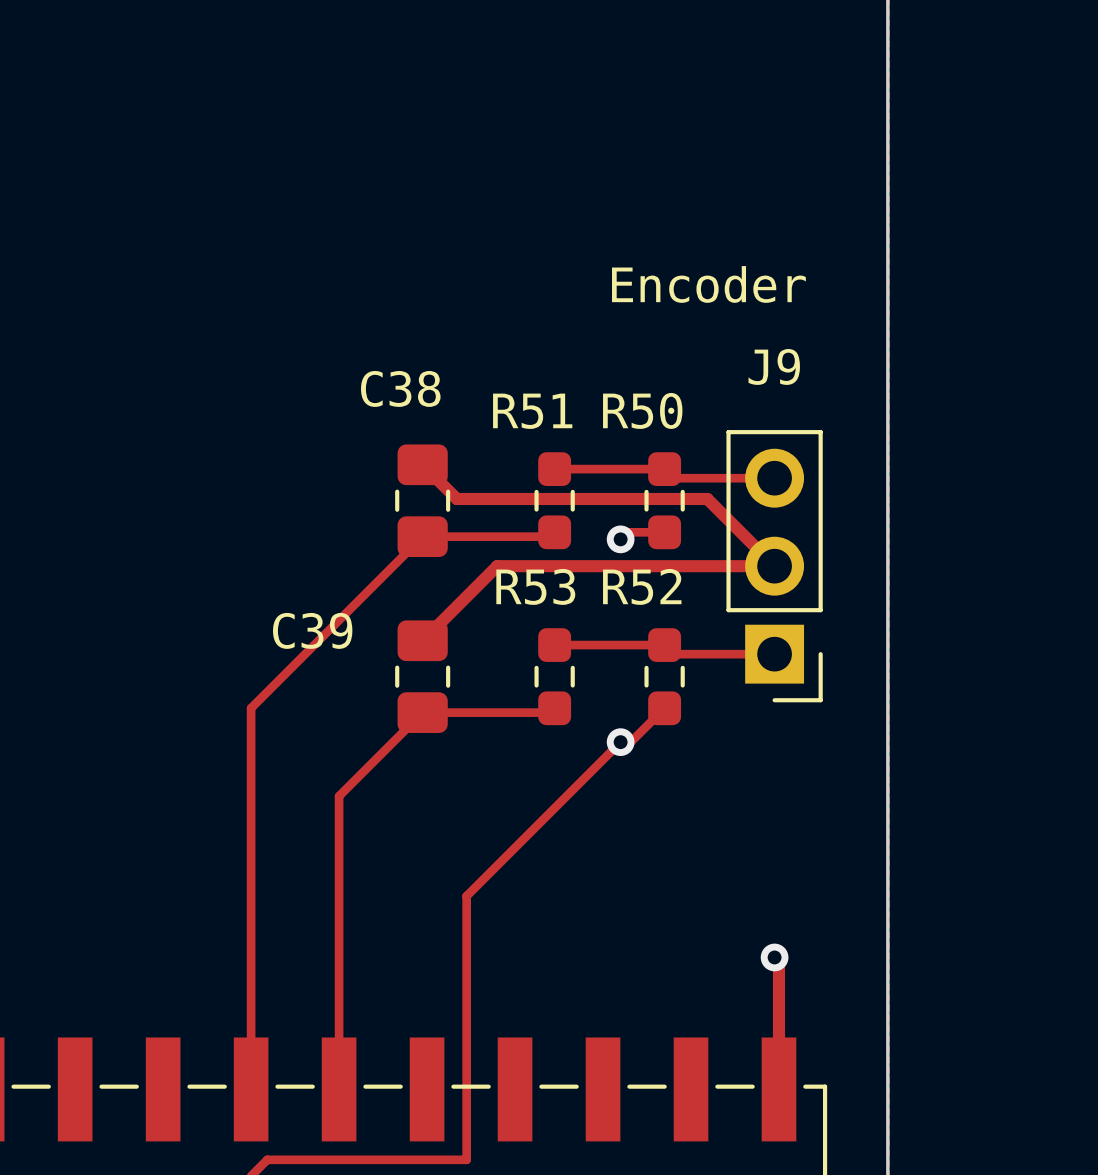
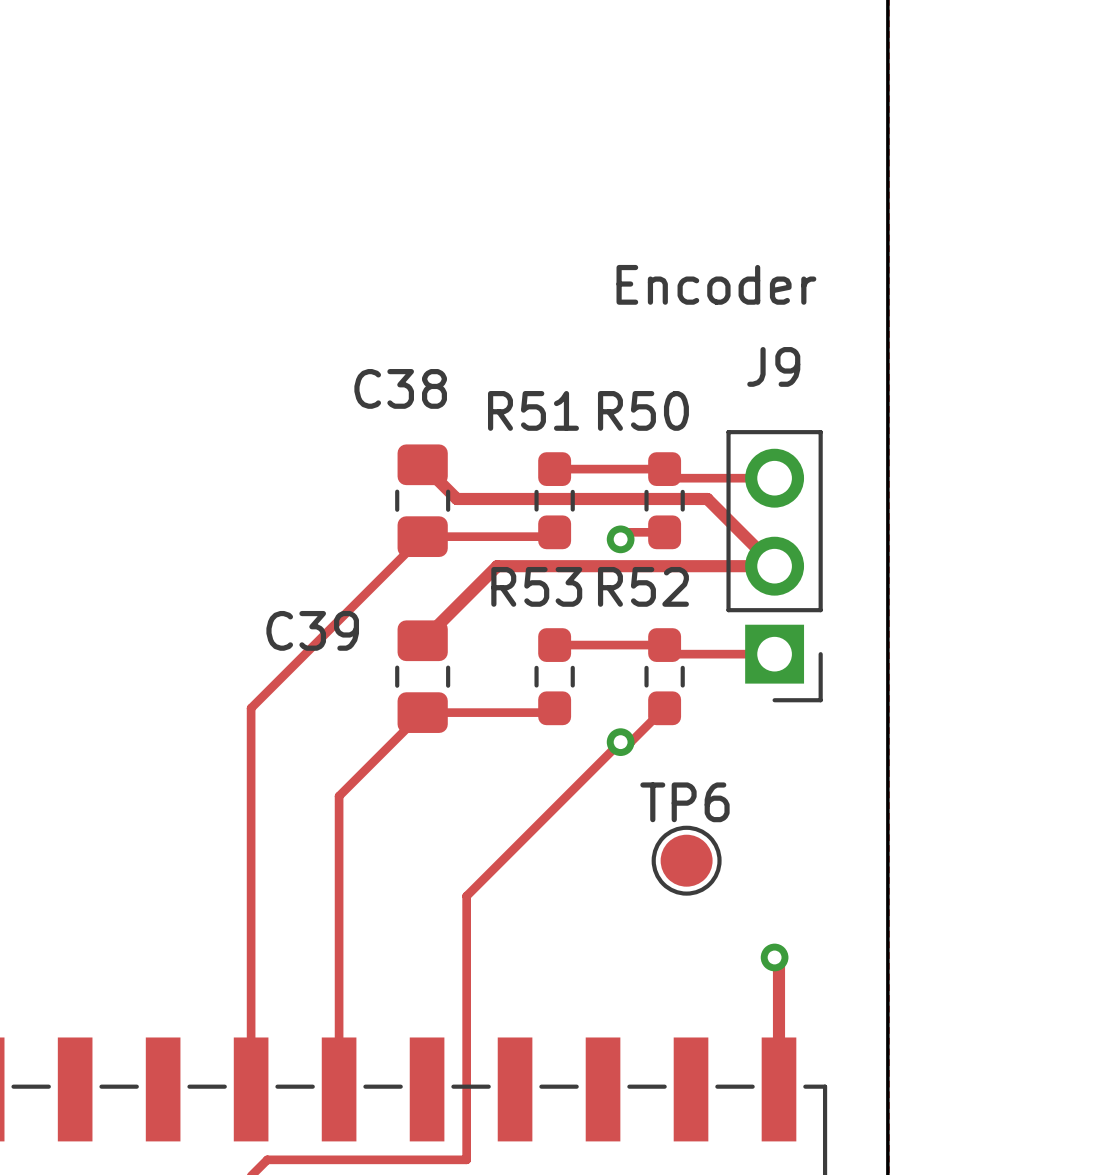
TP6: none -> (686, 860)

